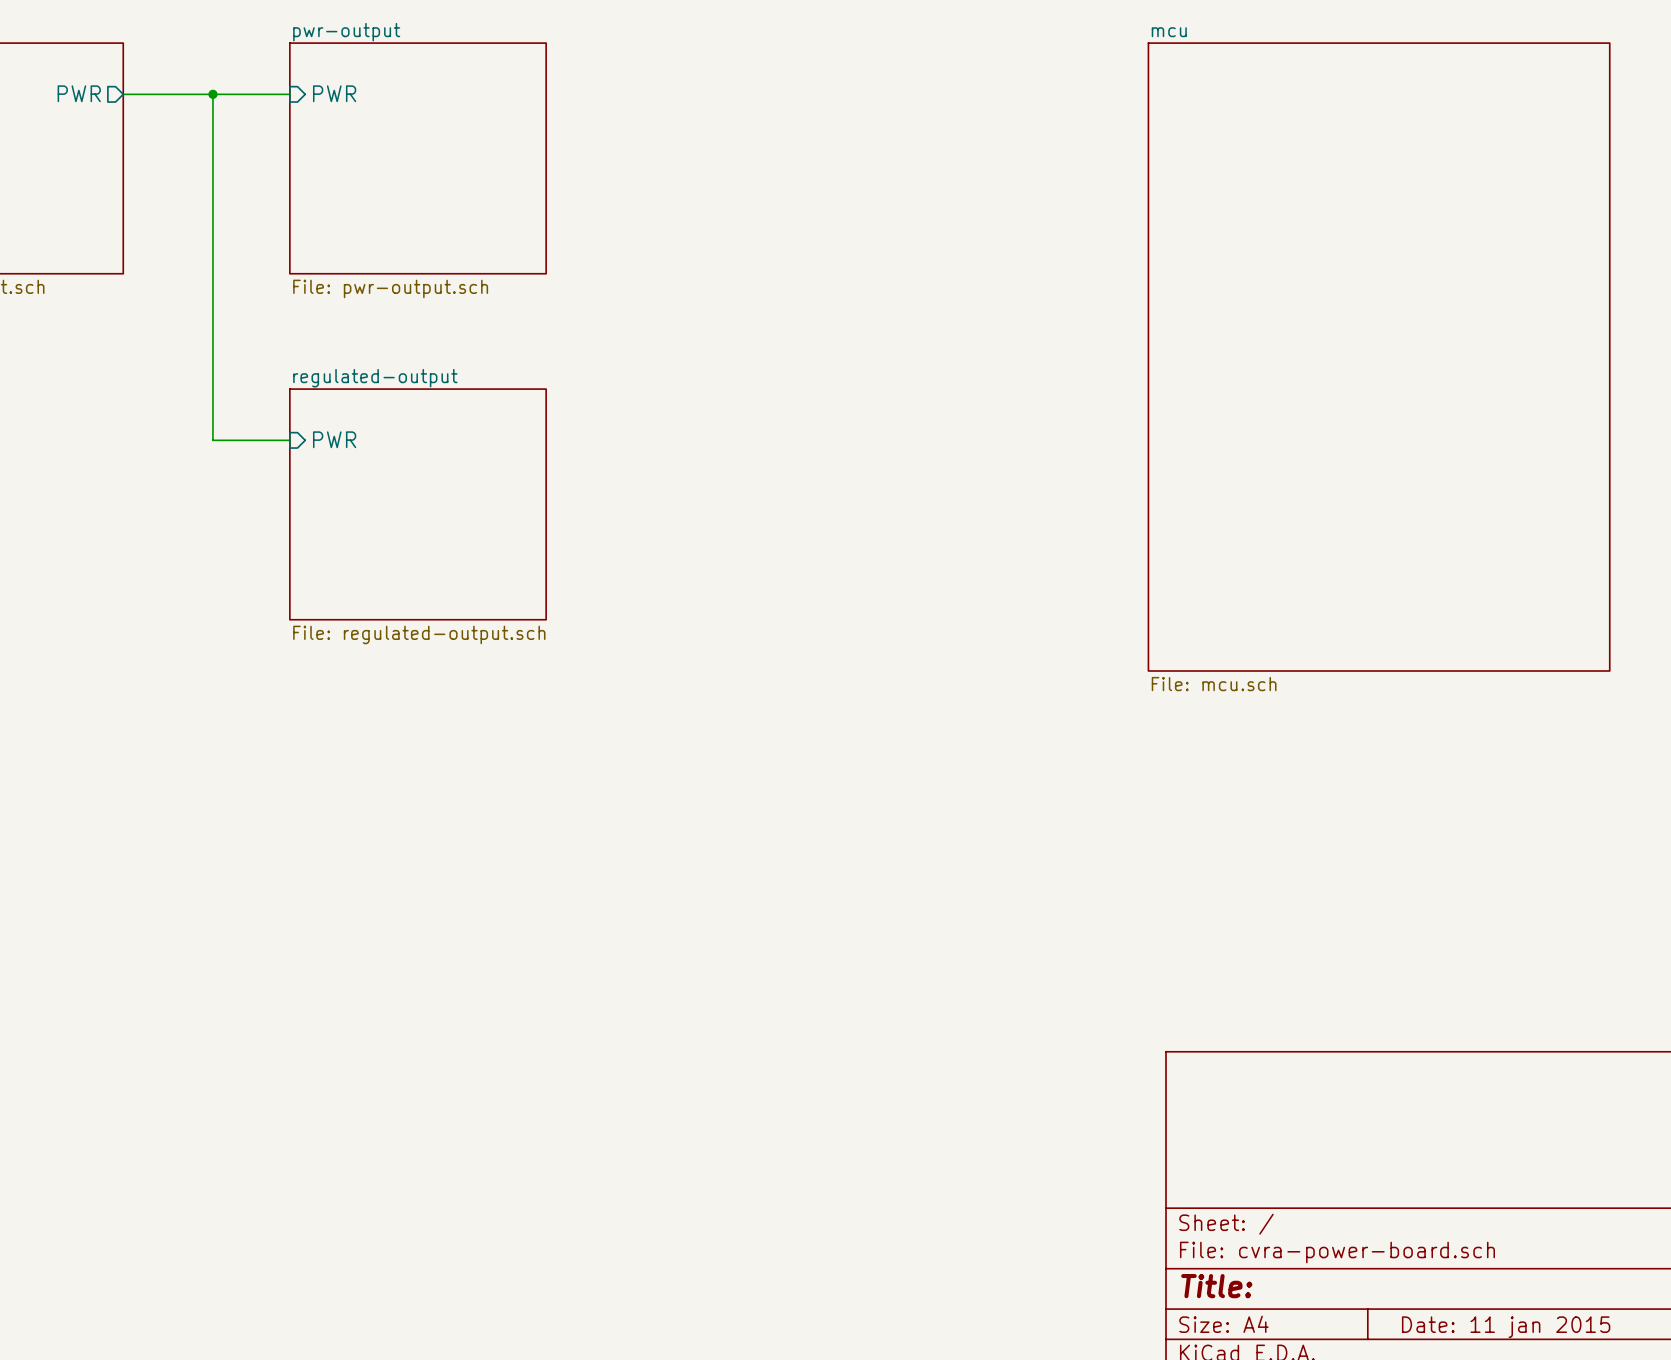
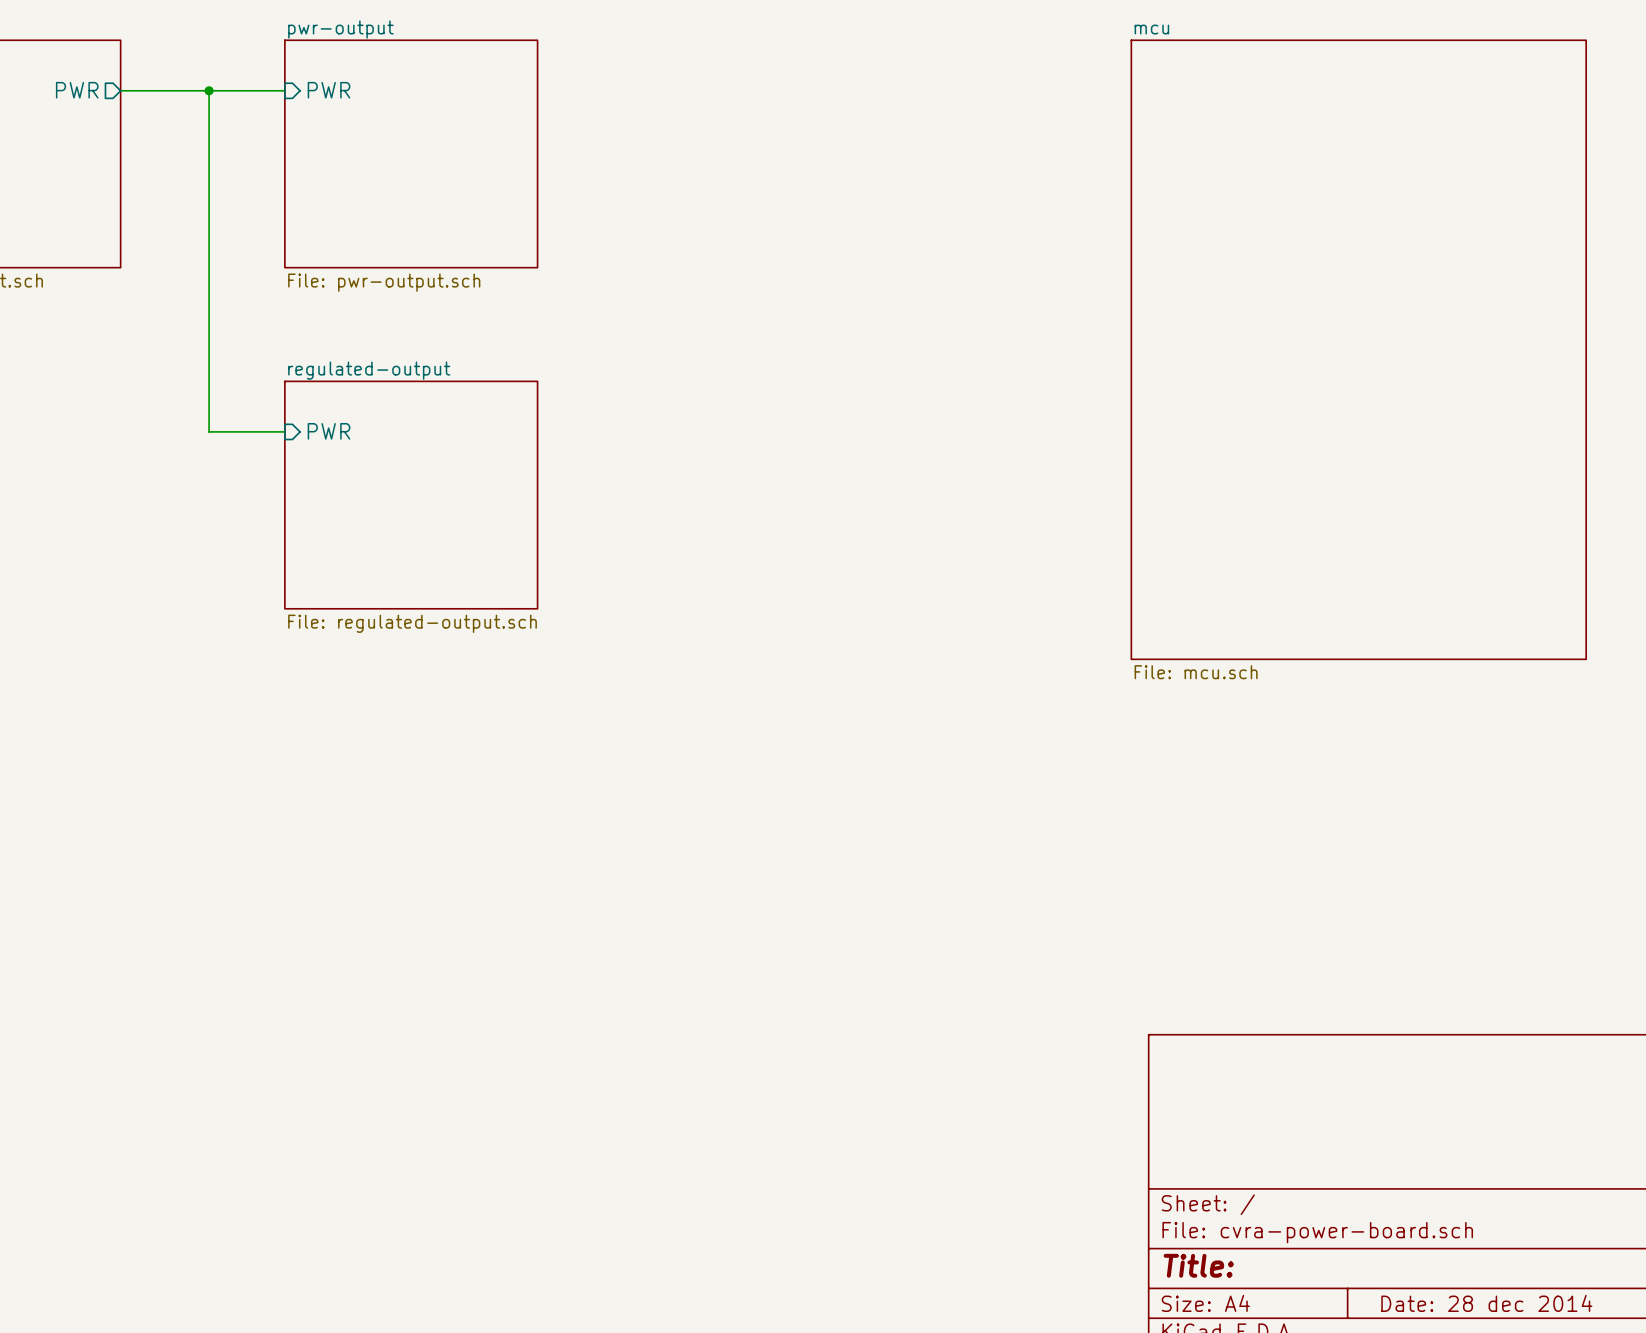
title block: Date: 11 jan 2015 (1506, 1327) -> Date: 28 dec 2014 (1486, 1303)

